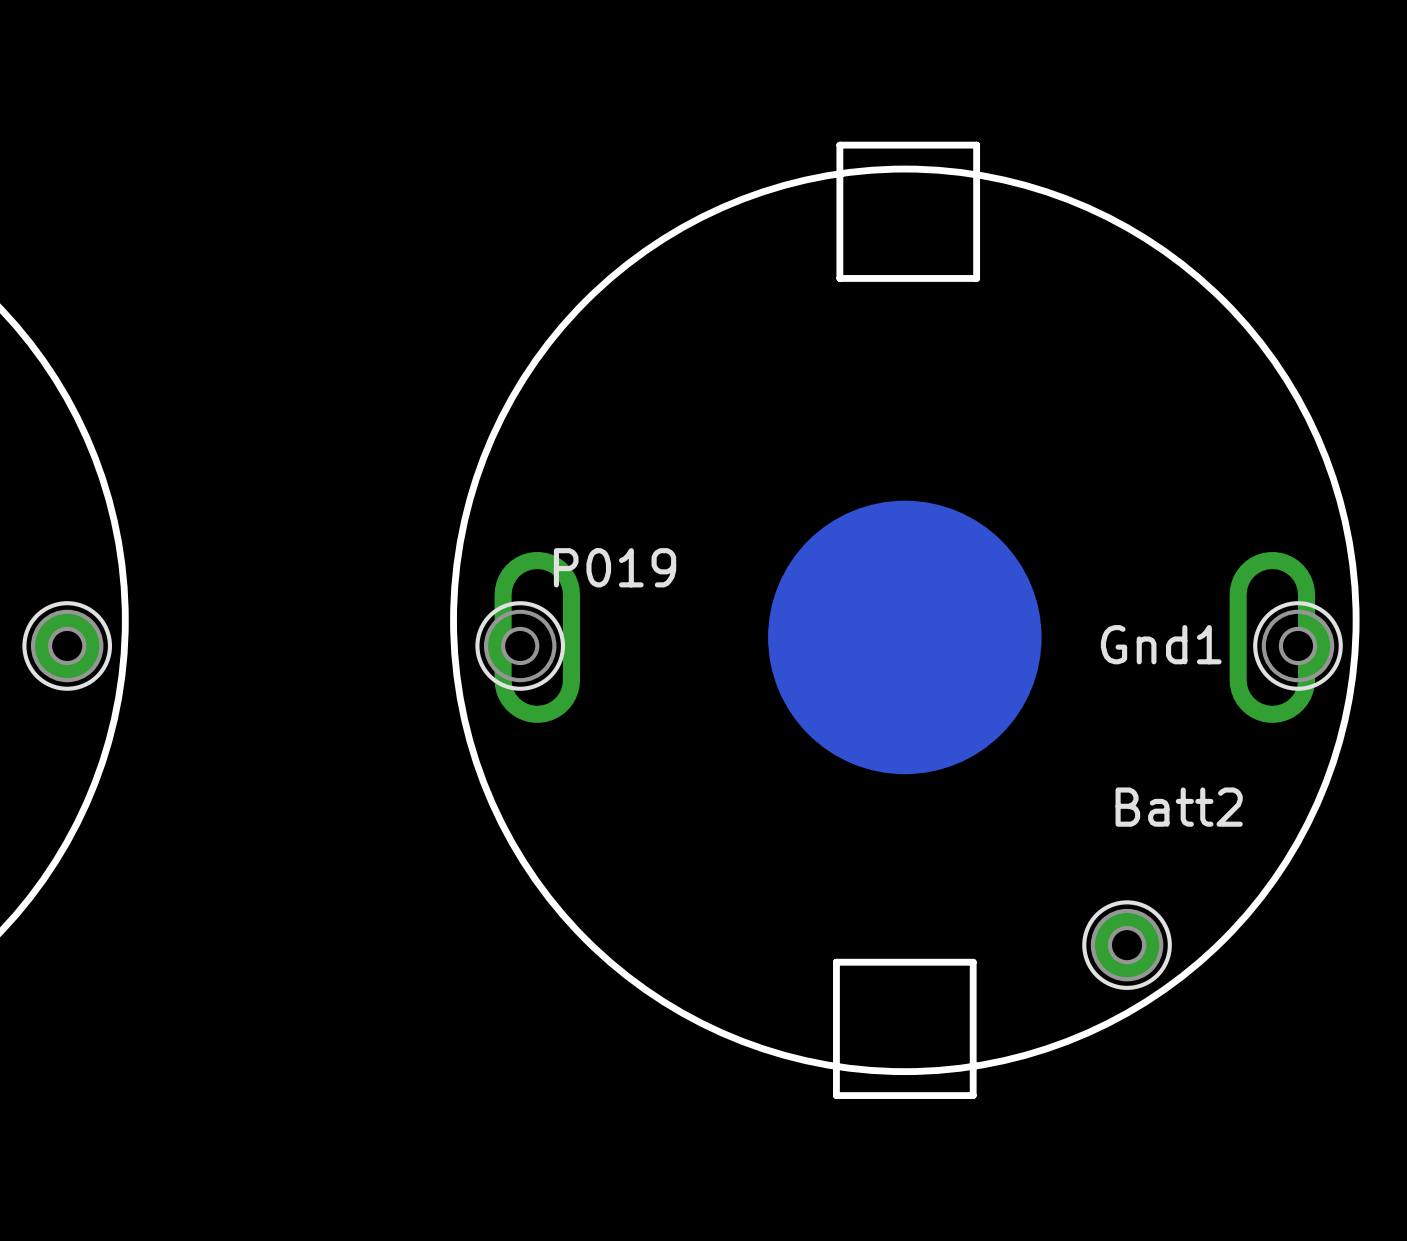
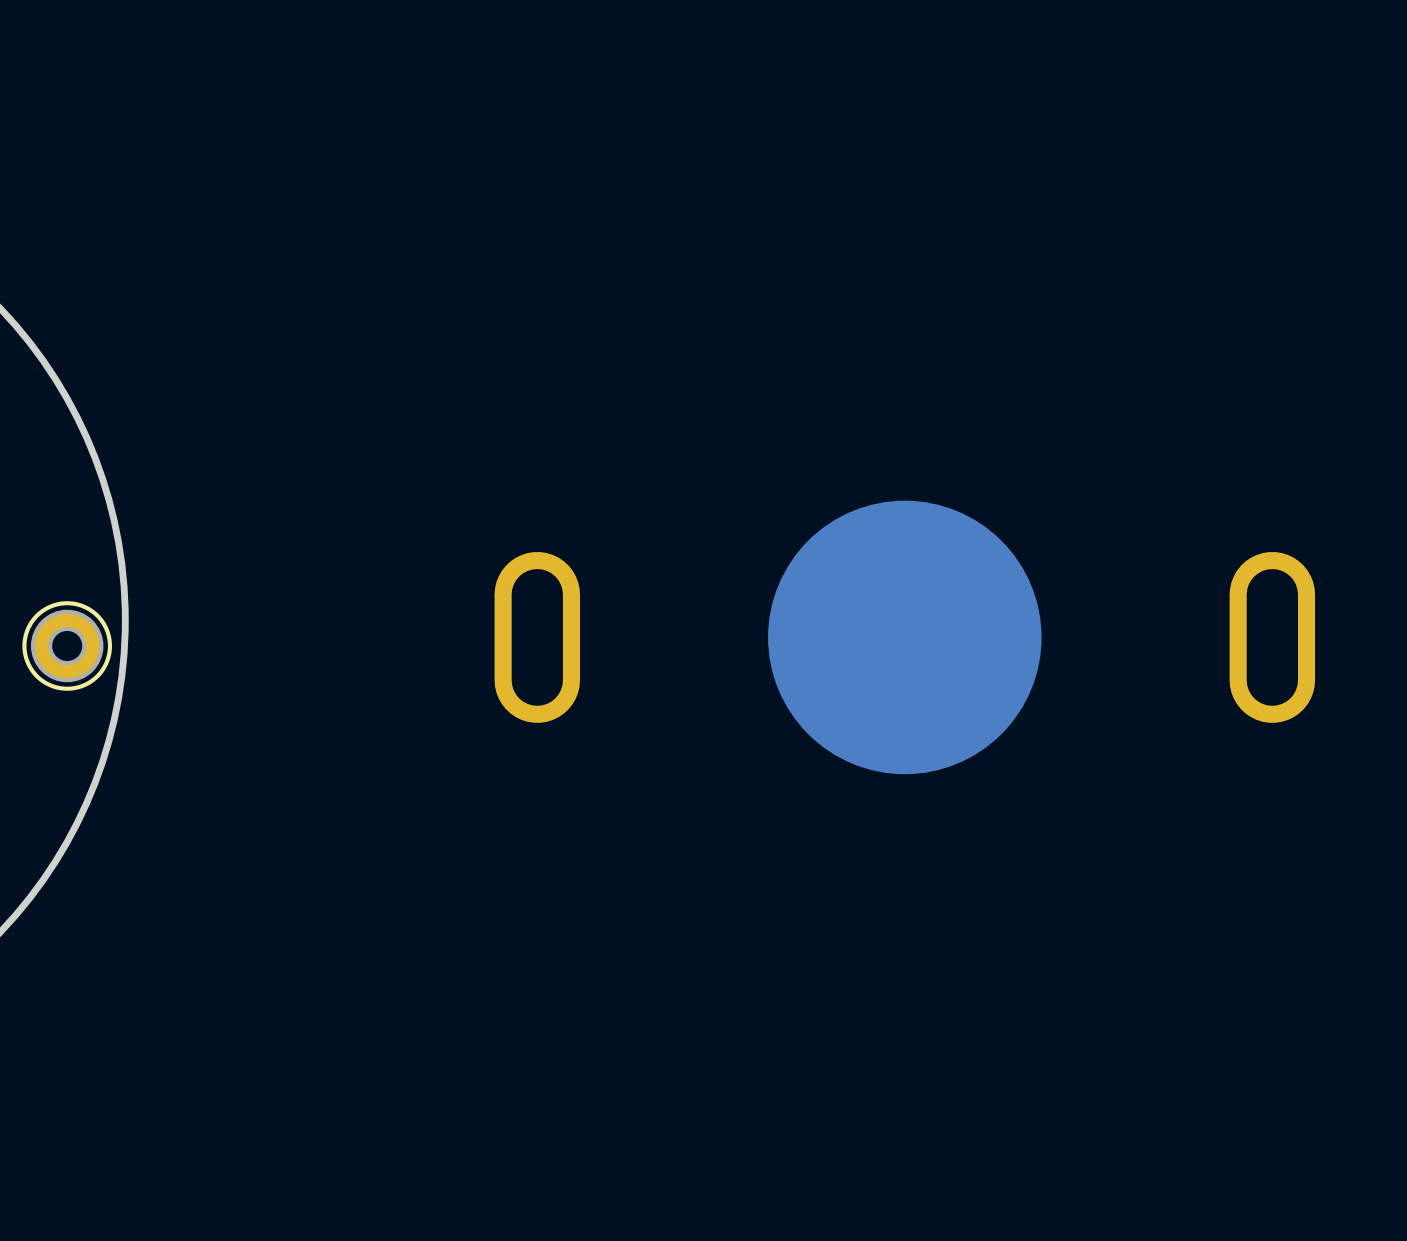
board edge: (839, 145) (976, 145) (976, 278) (839, 278) (839, 145) -> none
round board edge: [450, 165, 1360, 1076] -> none
P019: (520, 645) -> none
Gnd1: (1297, 645) -> none
Batt2: (1127, 945) -> none
board edge: (836, 962) (973, 962) (973, 1095) (836, 1095) (836, 962) -> none

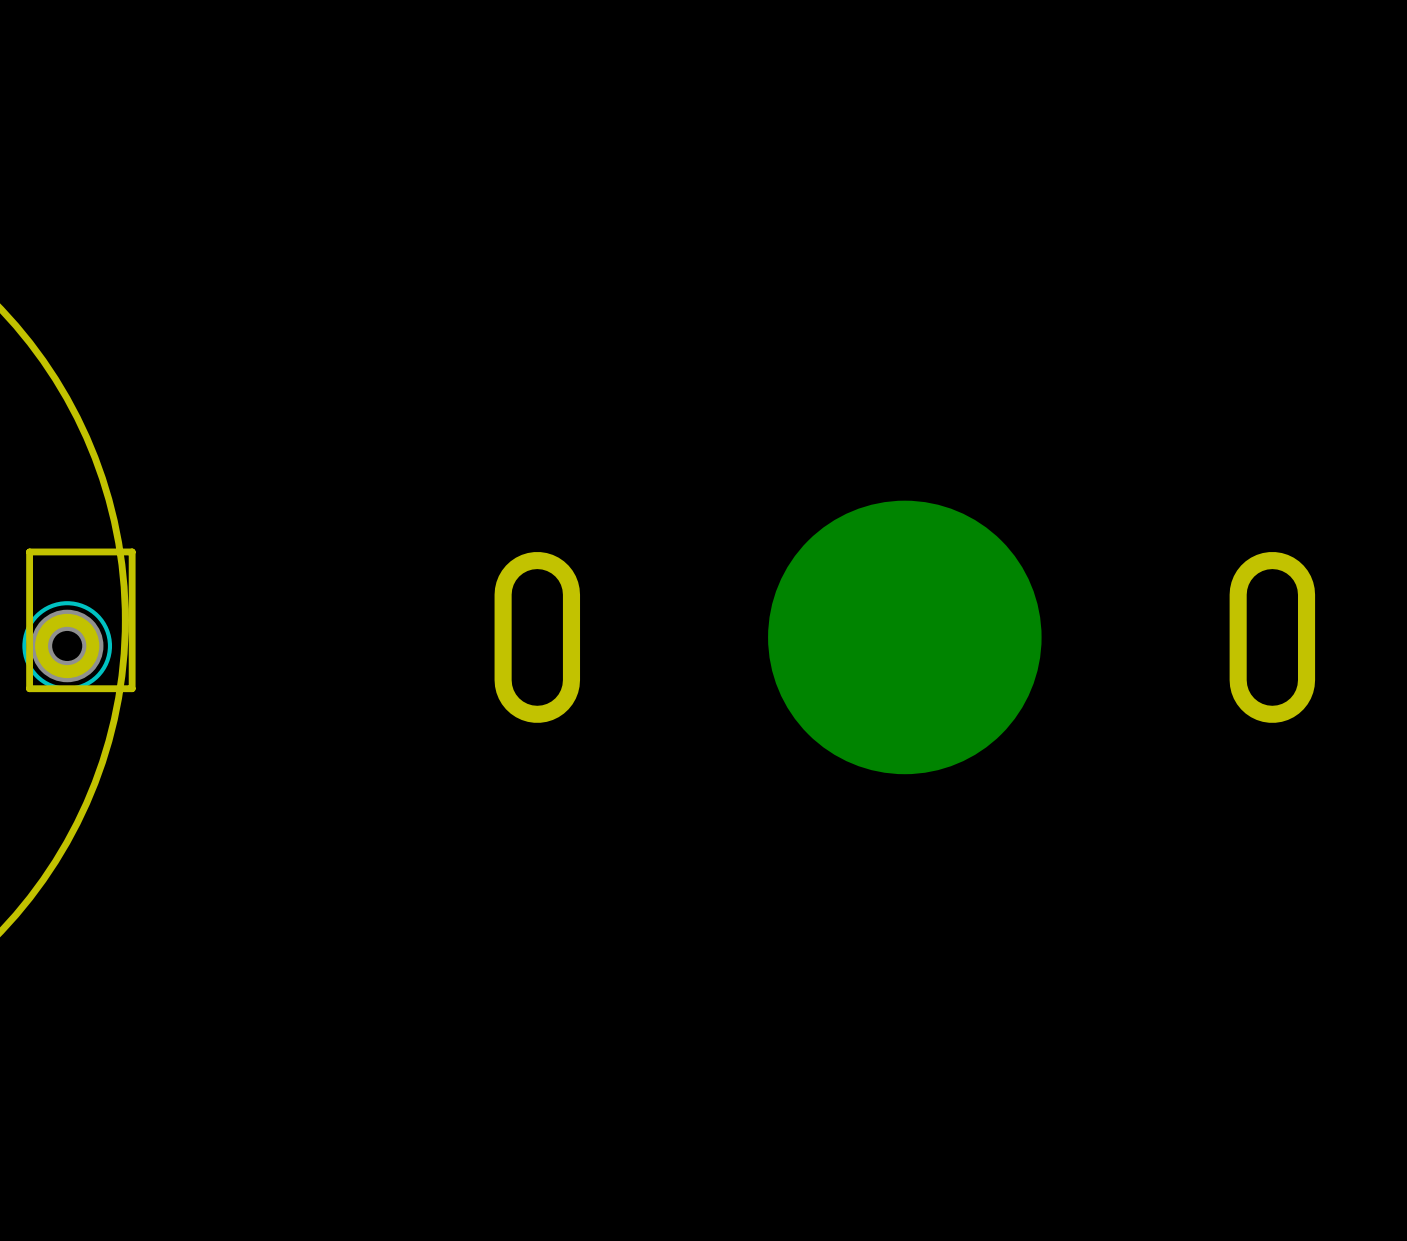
board edge: none -> (29, 551) (132, 551) (132, 688) (29, 688) (29, 551)

